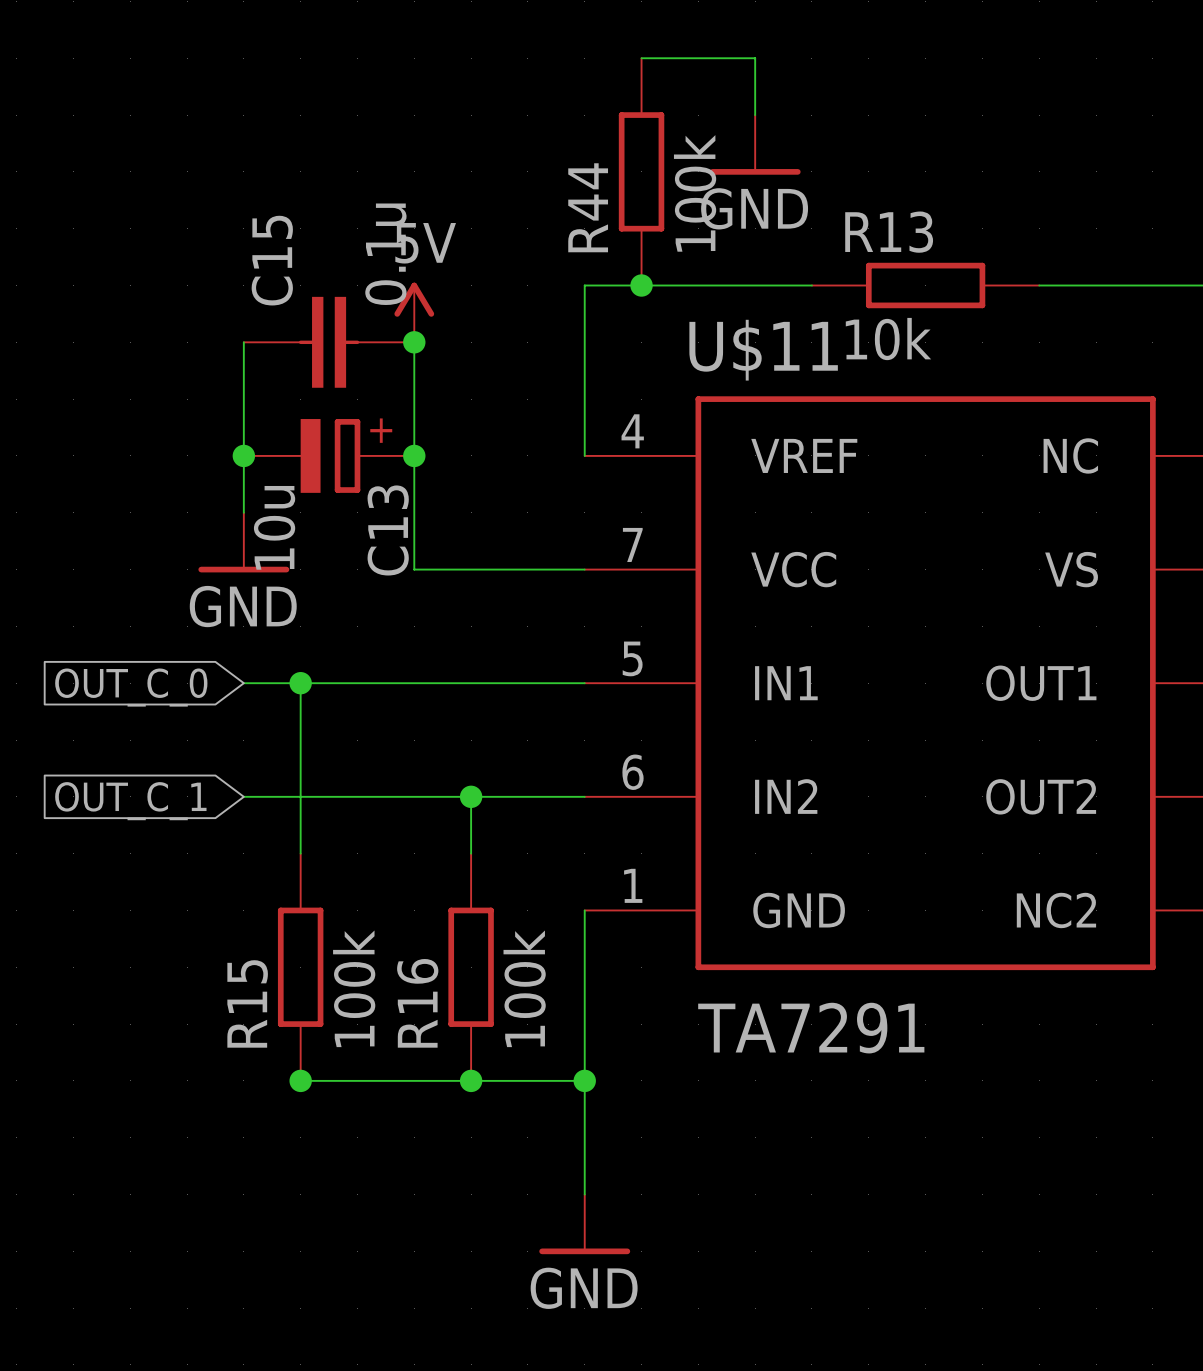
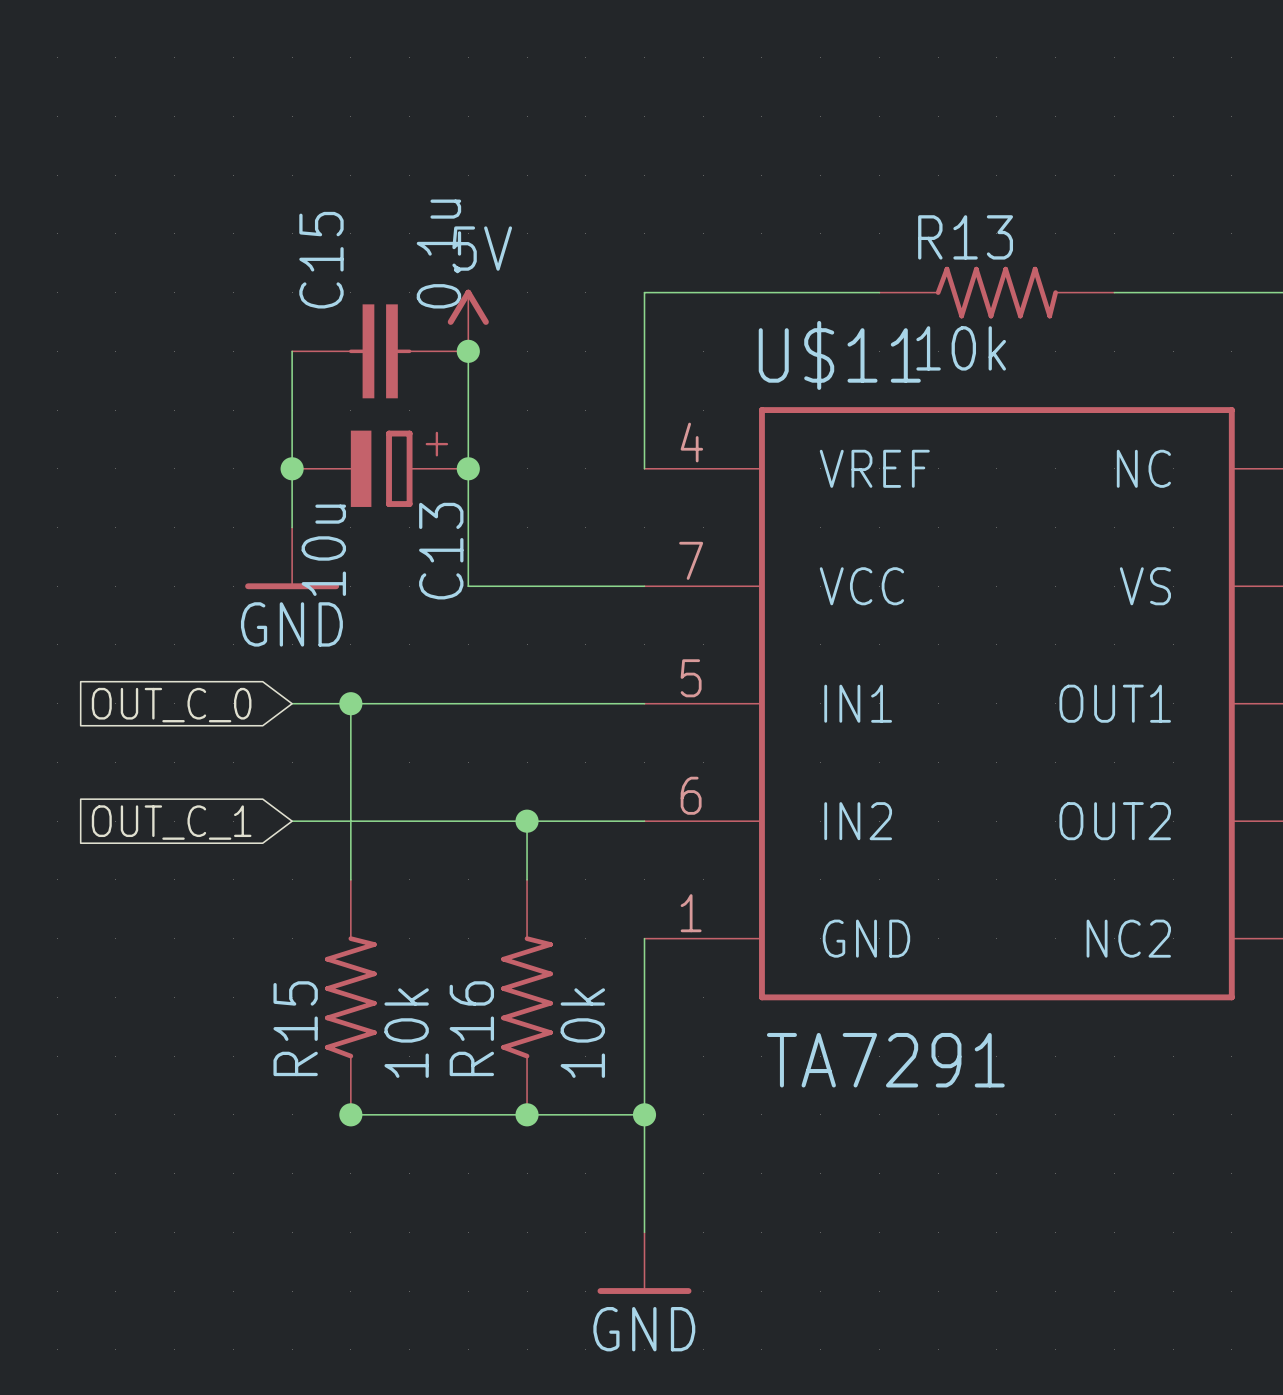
wire: (641, 58) (755, 58) (755, 115) -> none
power symbol: GND (755, 144) -> none
R44: 100k (641, 171) -> none
R13 symbol: [811, 262, 1040, 309] -> [879, 266, 1115, 319]
junction: (641, 285) -> none
R15 symbol: [277, 853, 324, 1081] -> [325, 879, 377, 1115]
R16 symbol: [448, 853, 494, 1081] -> [501, 879, 553, 1115]
R15 value: 100k (354, 988) -> 10k (406, 1033)
R16 value: 100k (524, 988) -> 10k (582, 1033)

